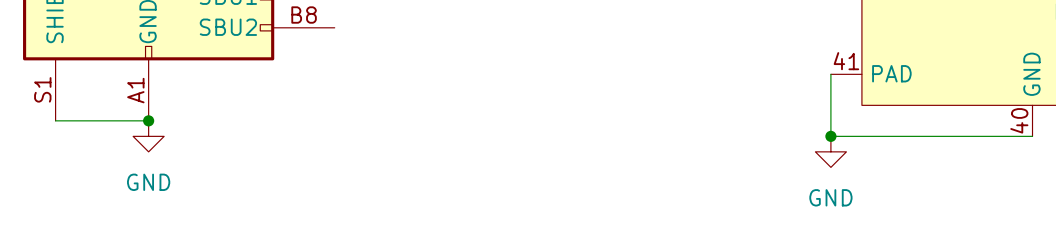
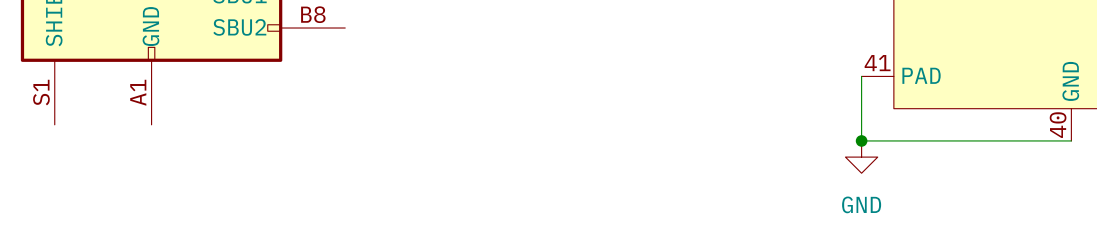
wire: (55, 120) (148, 120) -> none
junction: (148, 120) -> none
power symbol: GND (148, 136) -> none

